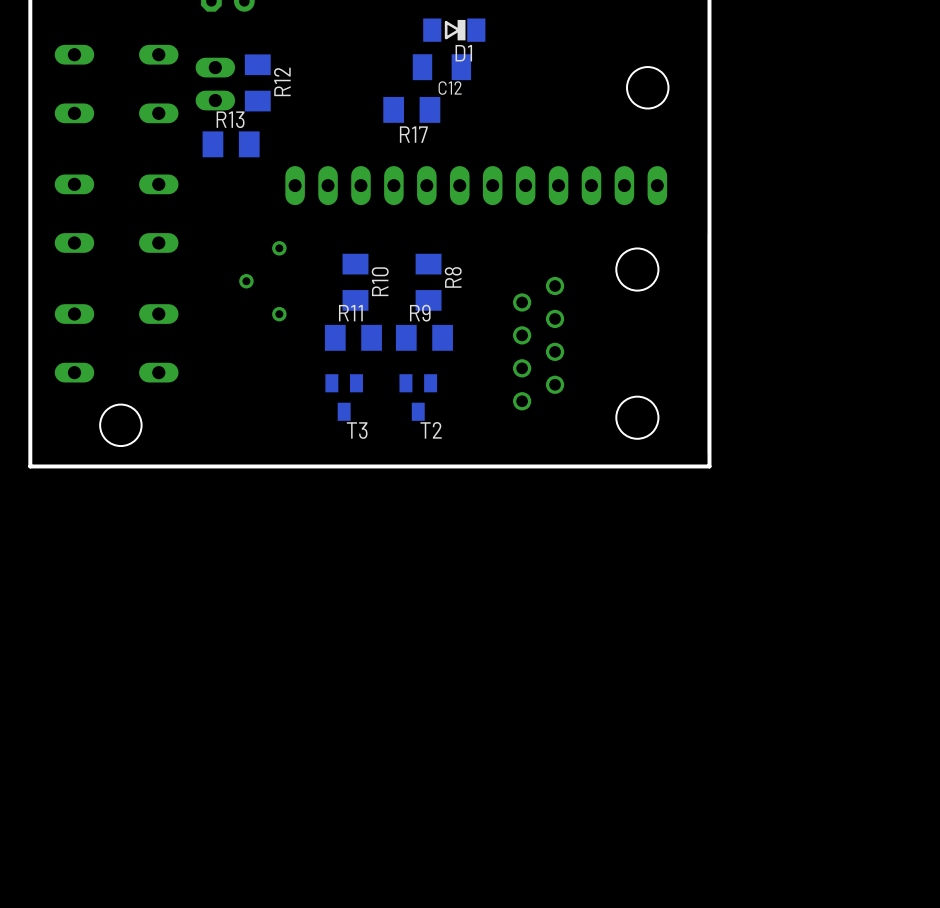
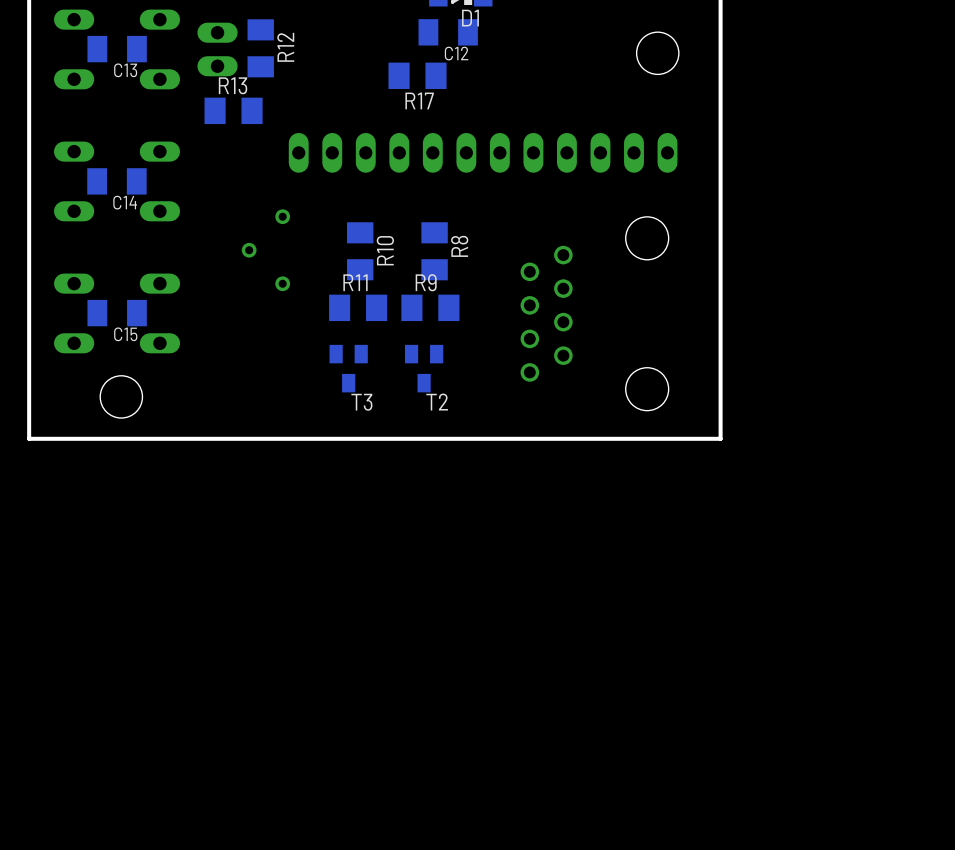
C13: none -> (117, 49)
C14: none -> (116, 181)
C15: none -> (117, 313)

